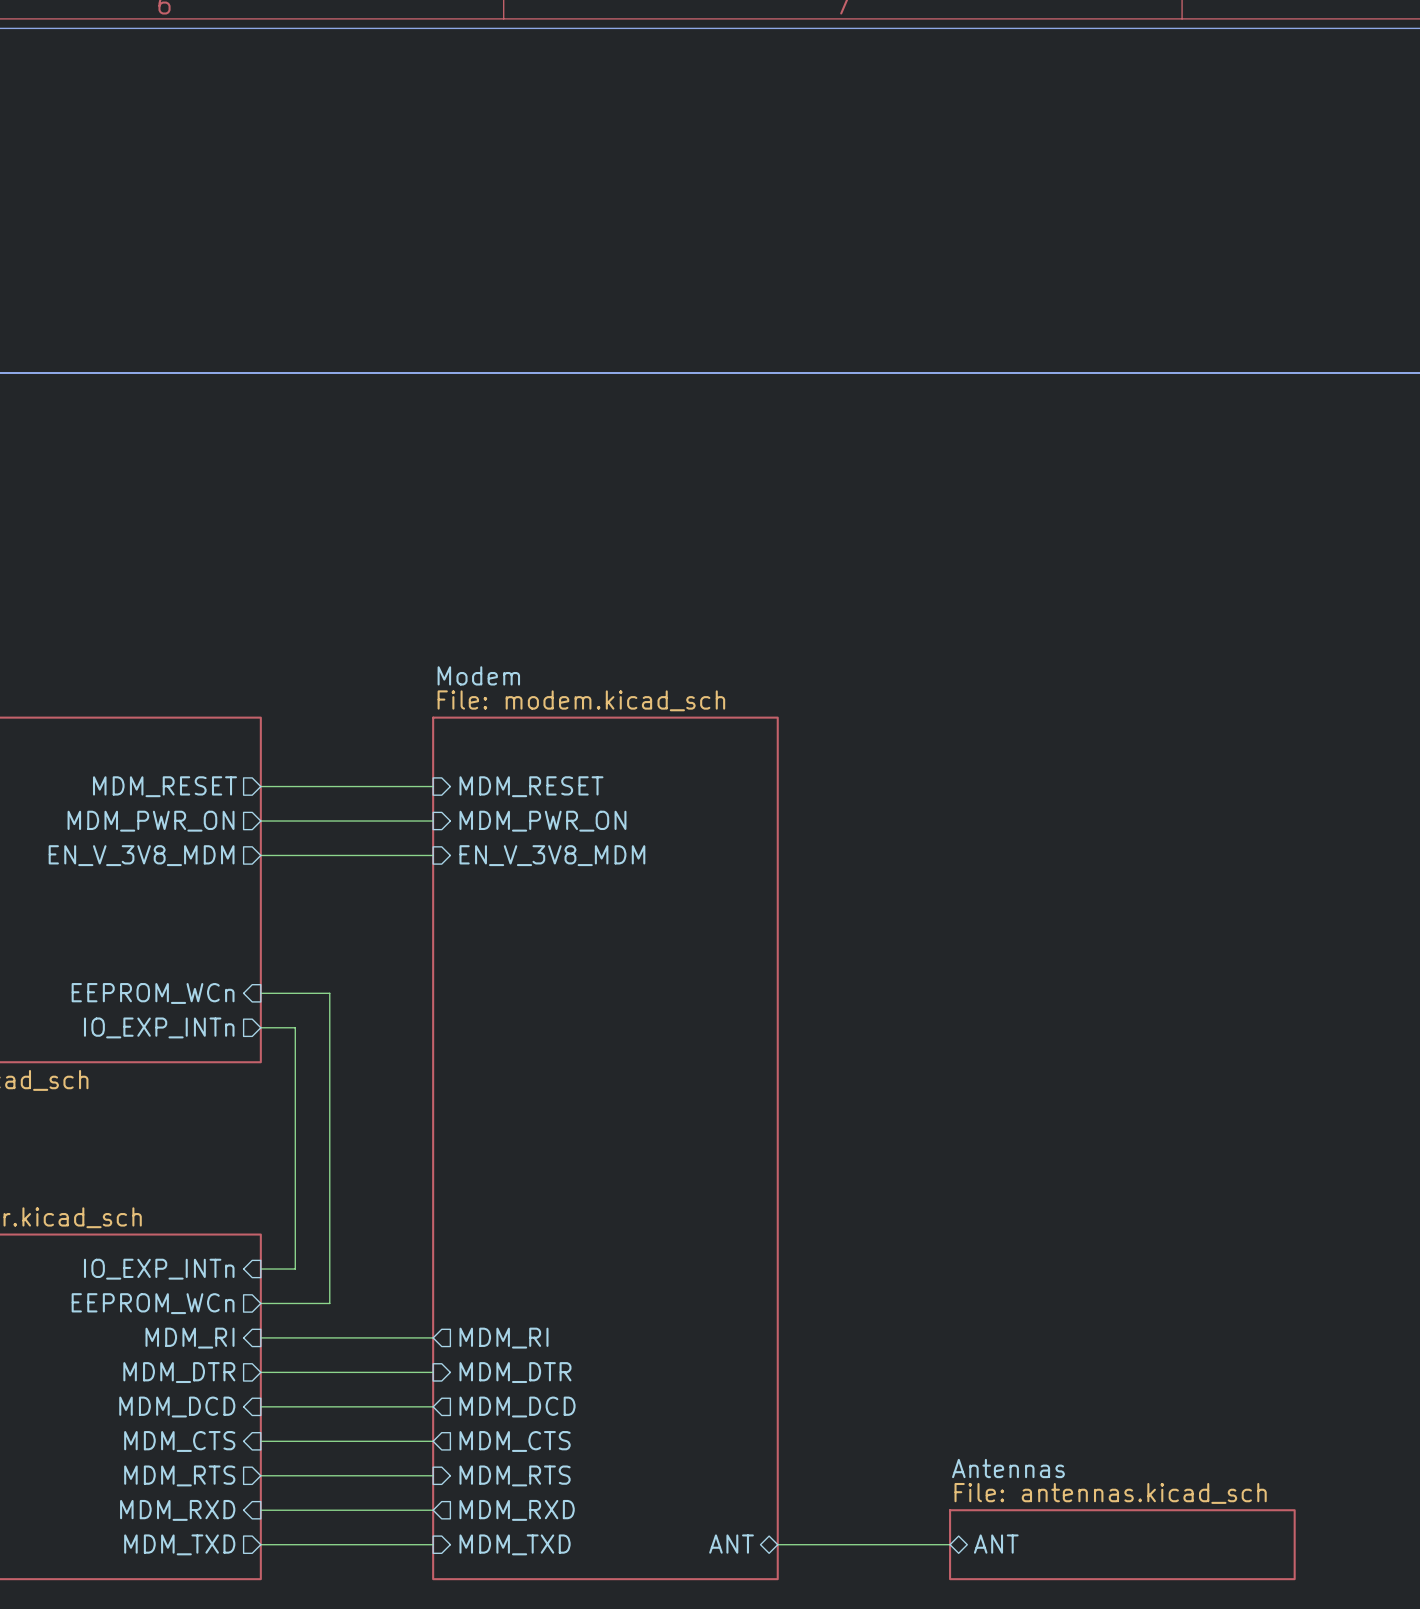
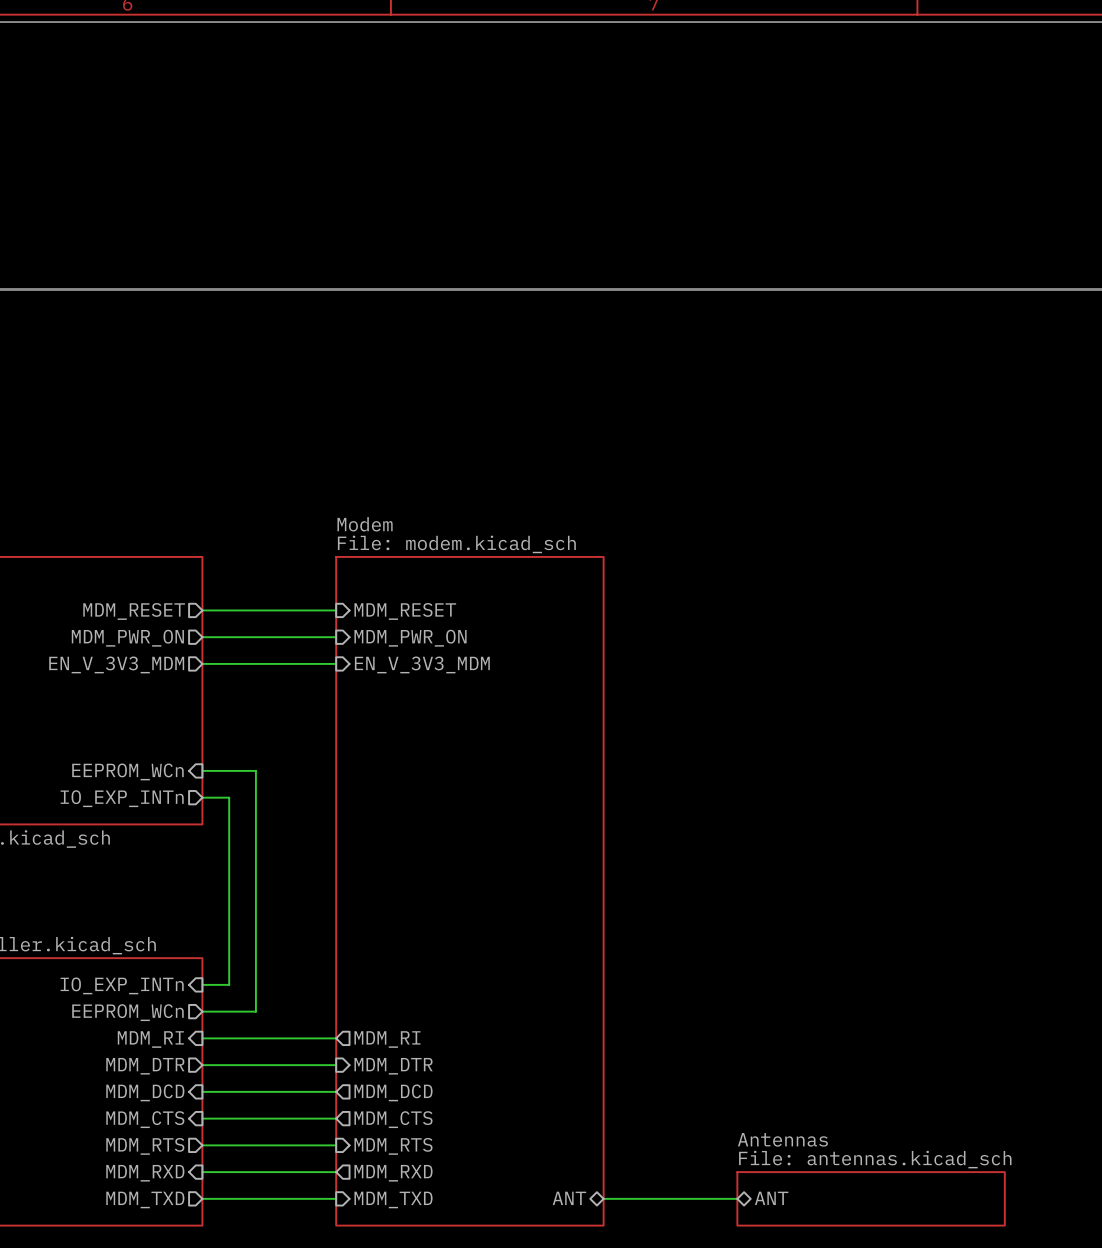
sheet pin: EN_V_3V8_MDM (141, 855) -> EN_V_3V3_MDM (116, 664)
sheet pin: EN_V_3V8_MDM (552, 855) -> EN_V_3V3_MDM (422, 664)

